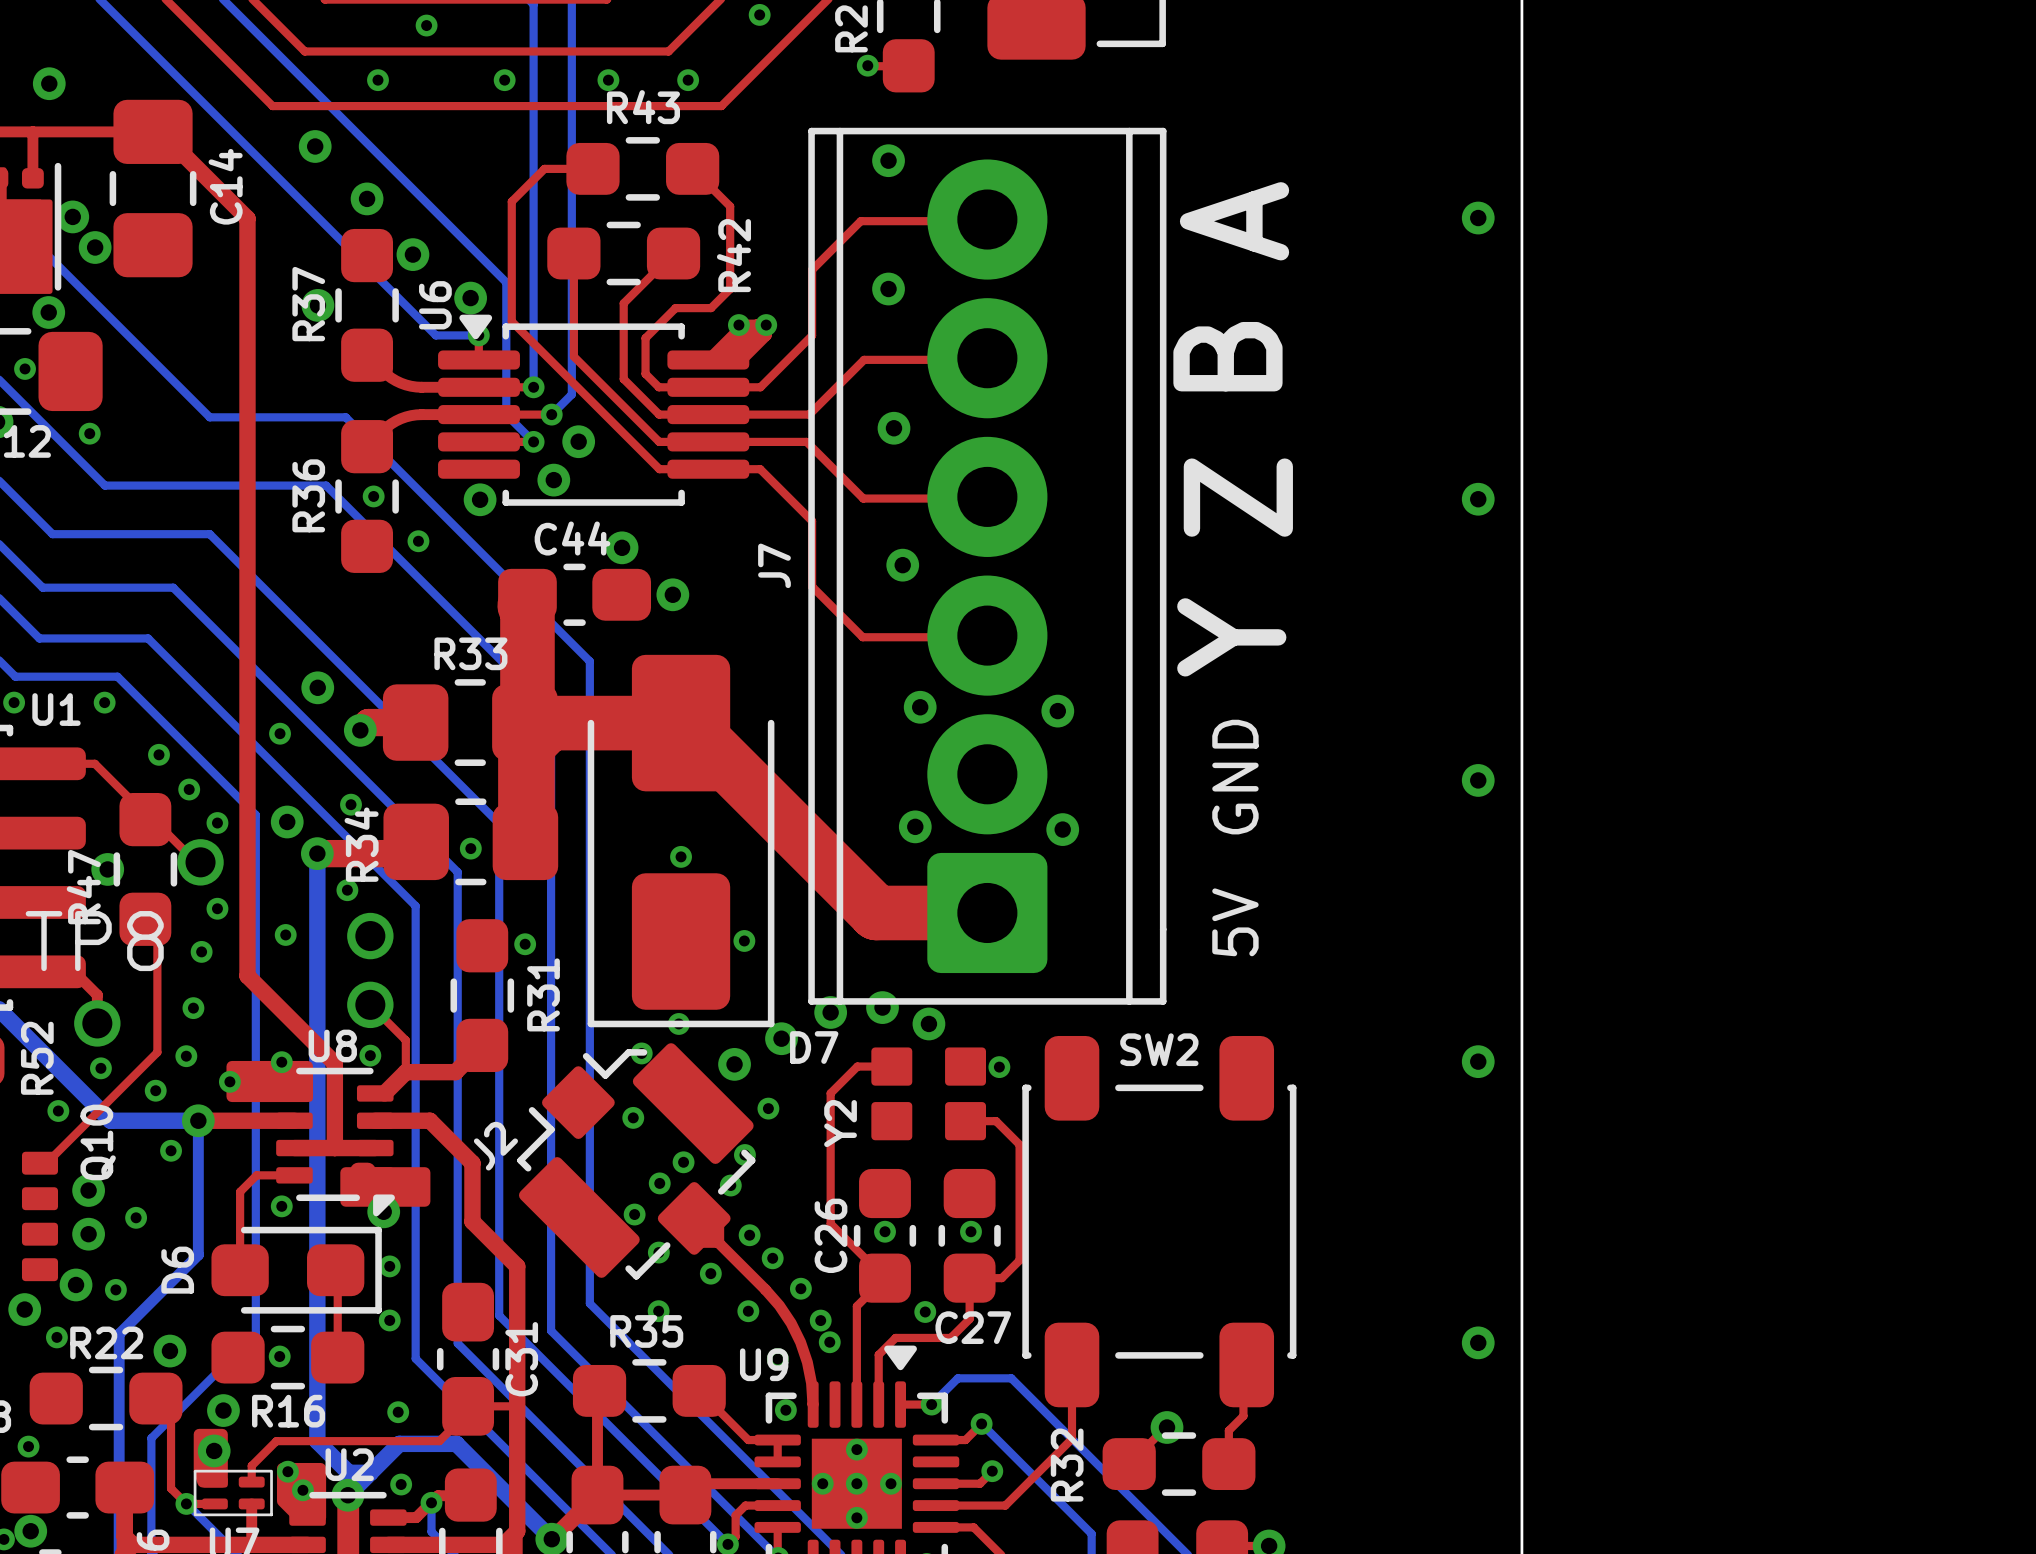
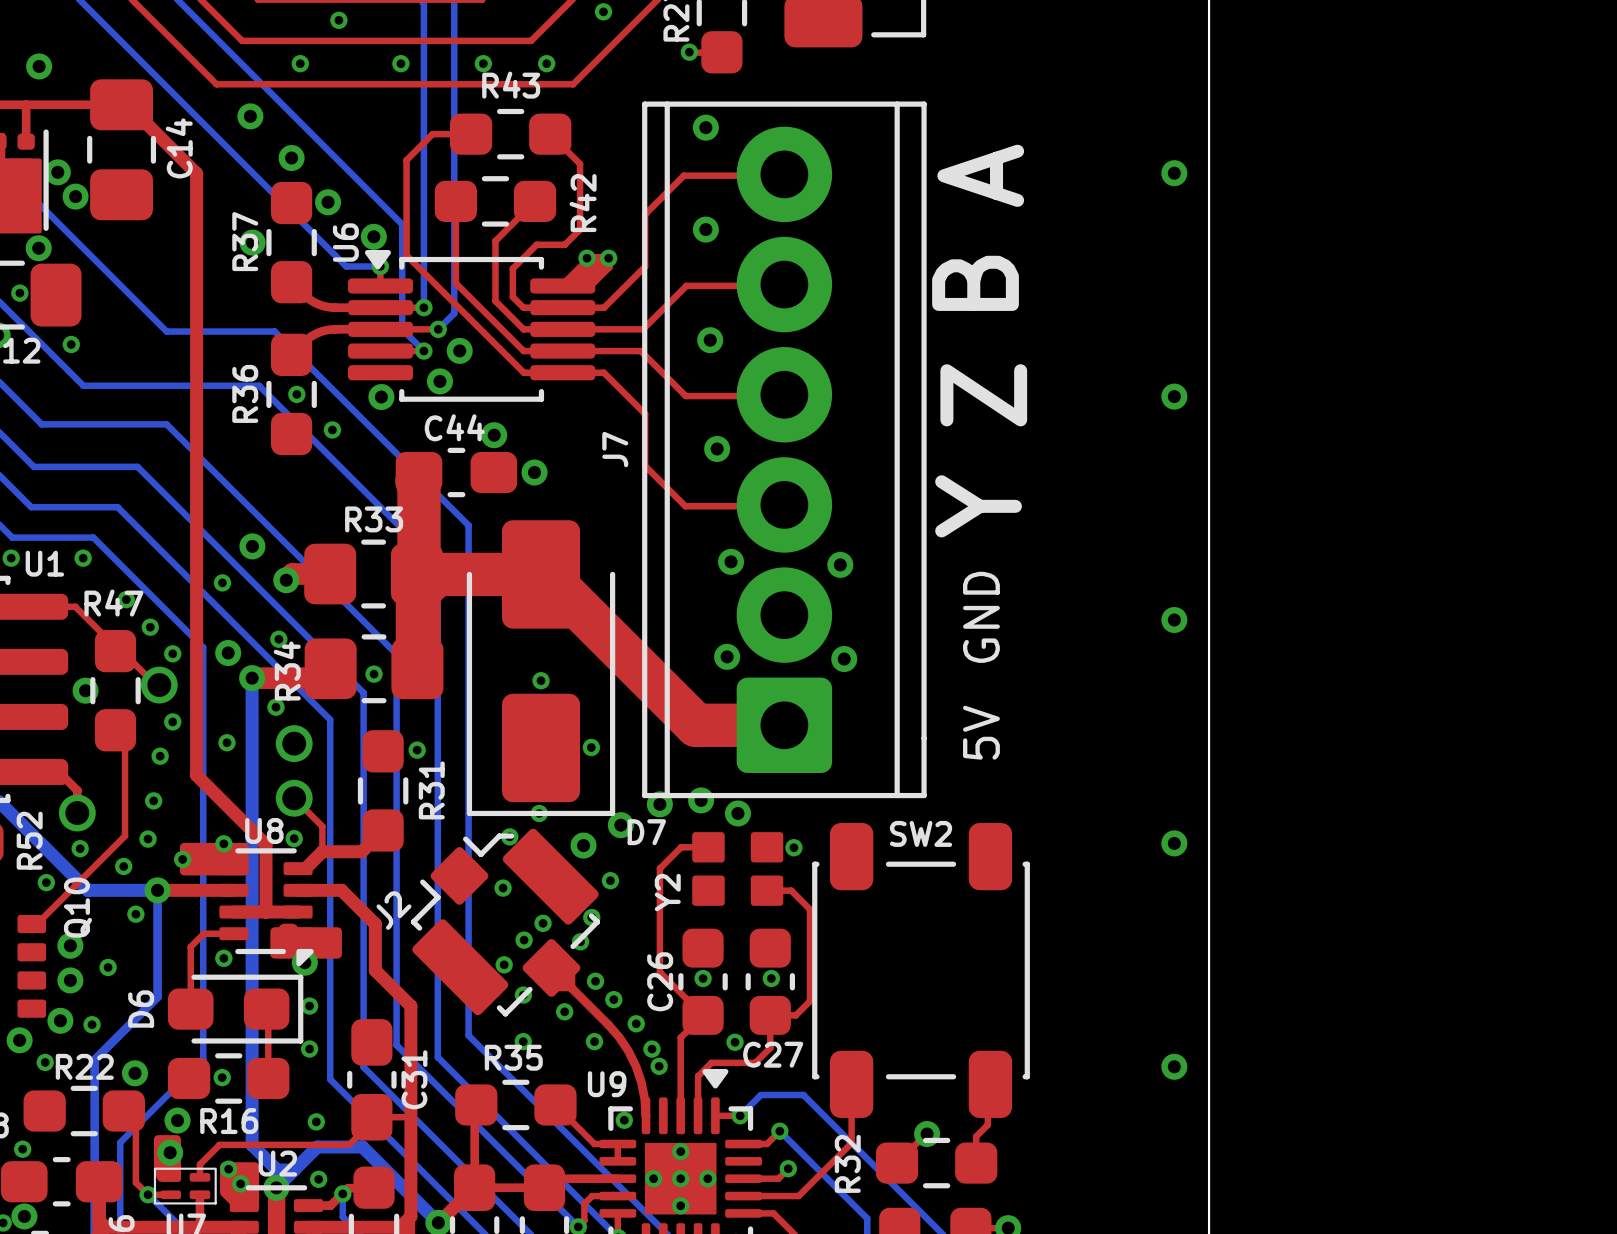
R47 name rotation: 0° (83, 887) -> 90° clockwise (113, 603)
R47 name position: R47 (83, 887) -> R47 (113, 603)
TP8 name: TP8 (94, 941) -> none

